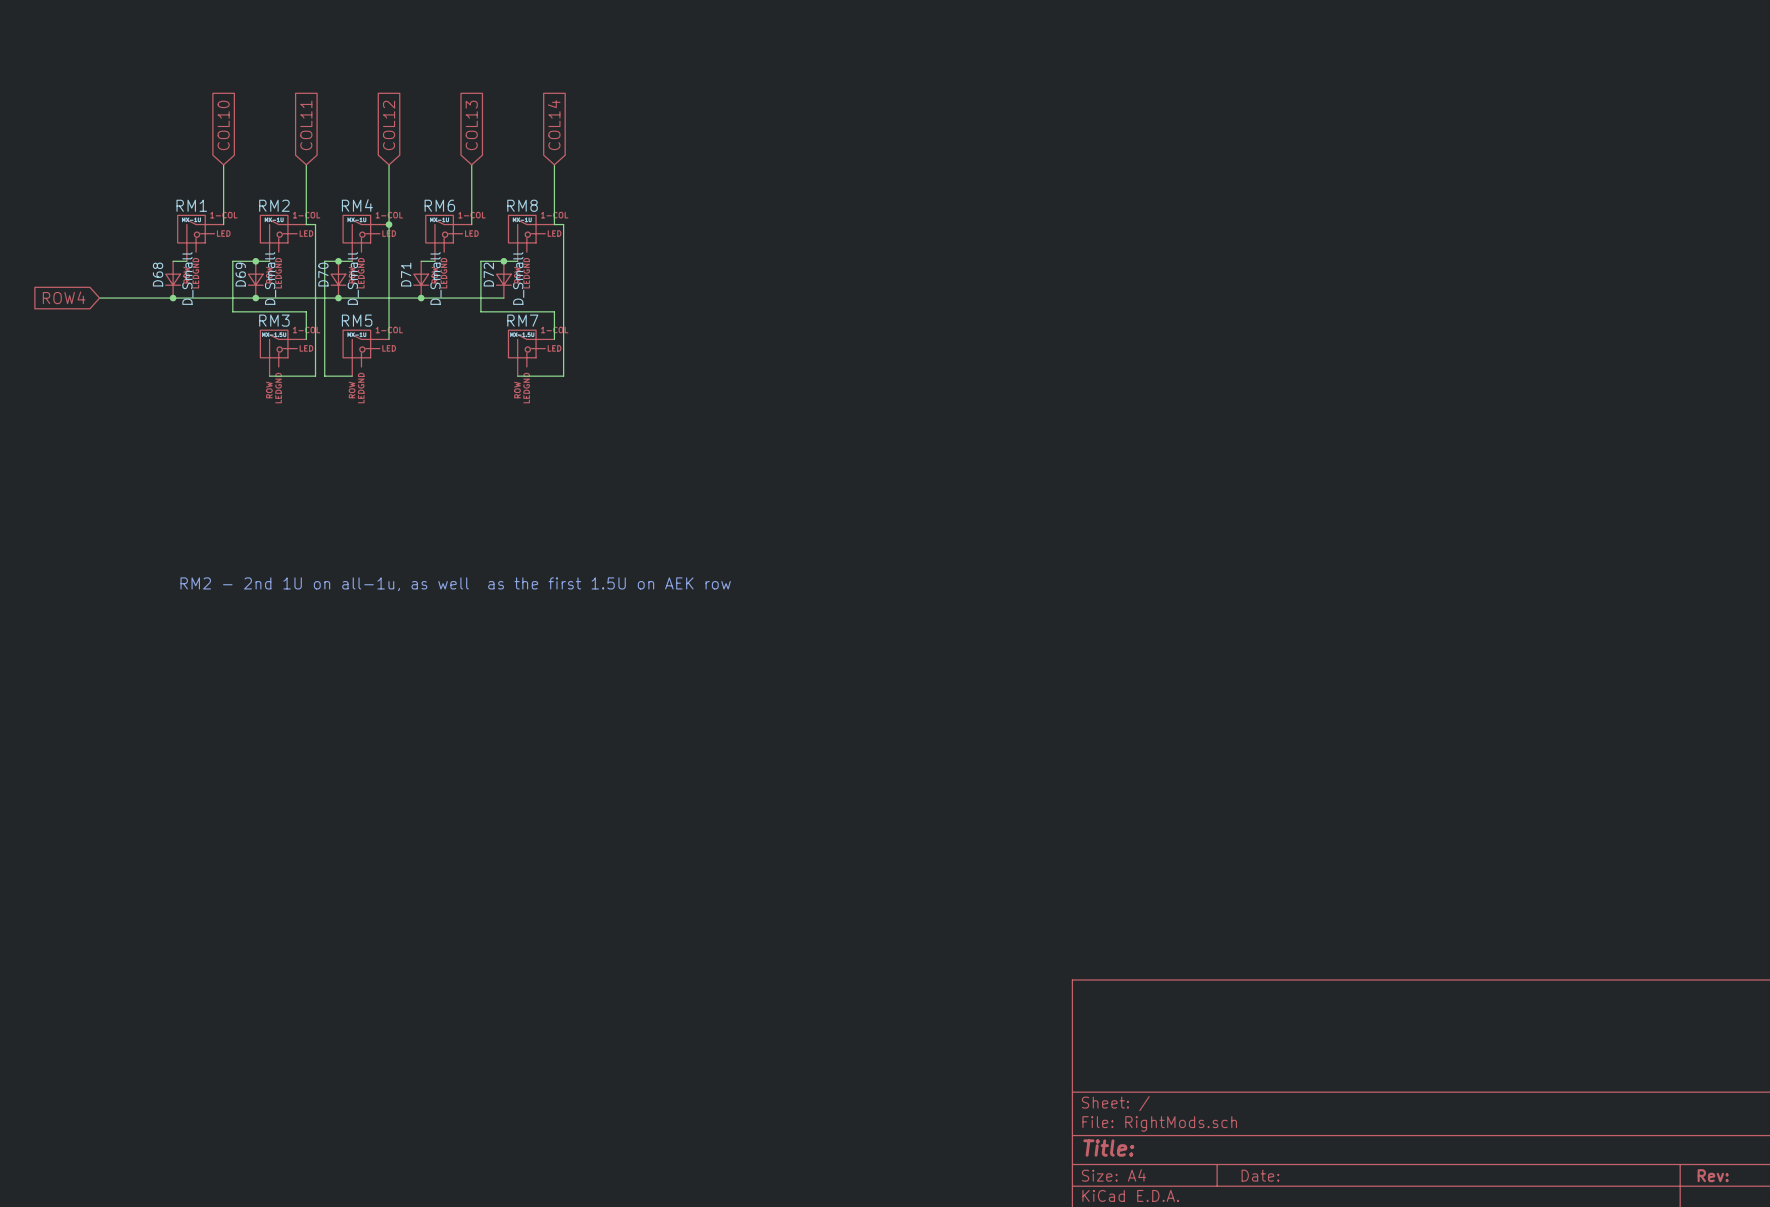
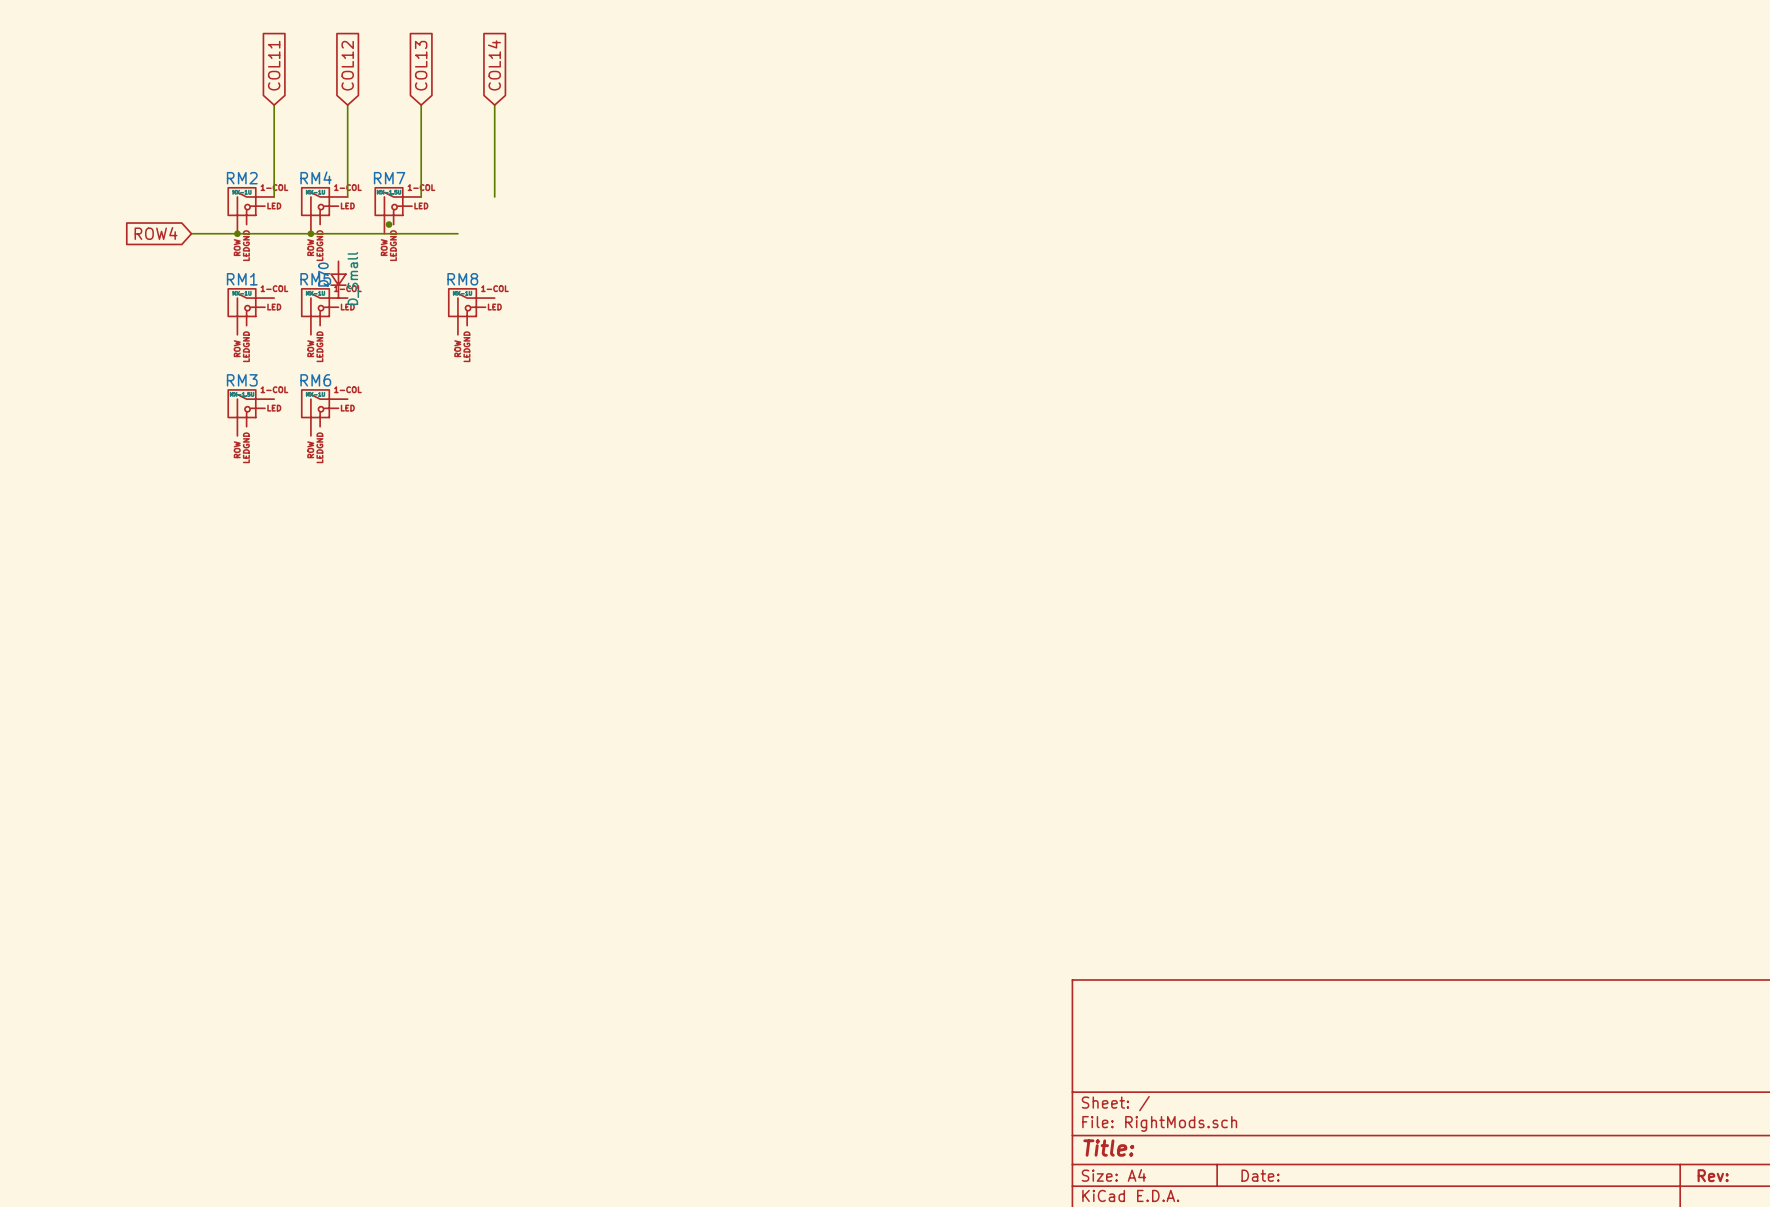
wire: none -> (274, 105) (274, 196)
wire: none -> (347, 105) (347, 196)
wire: none -> (421, 105) (421, 196)
wire: none -> (494, 105) (494, 196)
global label: COL10 (223, 125) -> none
global label position: COL11 (306, 125) -> COL11 (274, 65)
global label position: COL12 (389, 125) -> COL12 (347, 65)
global label position: COL13 (471, 125) -> COL13 (421, 65)
global label position: COL14 (554, 125) -> COL14 (494, 65)
wire: (223, 164) (223, 224) -> none
wire: (306, 164) (306, 224) (315, 224) (315, 376) (269, 376) -> none
wire: (389, 164) (389, 339) -> none
wire: (471, 164) (471, 224) -> none
wire: (554, 164) (554, 224) (563, 224) (563, 376) (517, 376) -> none
wire: none -> (191, 233) (457, 233)
junction: none -> (237, 233)
junction: none -> (310, 233)
RM1 position: (200, 238) -> (250, 311)
RM2 position: (283, 238) -> (250, 210)
RM4 position: (365, 238) -> (324, 210)
RM6 position: (448, 238) -> (324, 412)
RM8 position: (531, 238) -> (471, 311)
wire: (173, 261) (186, 261) -> none
junction: (255, 261) -> none
wire: (269, 261) (232, 261) (232, 311) (306, 311) (306, 339) -> none
junction: (338, 261) -> none
wire: (352, 261) (324, 261) (324, 376) (352, 376) -> none
wire: (421, 261) (434, 261) -> none
junction: (503, 261) -> none
wire: (517, 261) (480, 261) (480, 311) (554, 311) (554, 339) -> none
D68: D_Small (173, 279) -> none
D69: D_Small (255, 279) -> none
D71: D_Small (421, 279) -> none
D72: D_Small (503, 279) -> none
global label position: ROW4 (64, 297) -> ROW4 (156, 233)
wire: (99, 298) (503, 298) -> none
junction: (173, 298) -> none
junction: (255, 298) -> none
junction: (338, 298) -> none
junction: (421, 298) -> none
RM3 position: (283, 352) -> (250, 412)
RM5 position: (365, 352) -> (324, 311)
RM7 position: (531, 352) -> (397, 210)
text: RM2 - 2nd 1U on all-1u, as well as the first 1.5U on AEK row (455, 584) -> none

